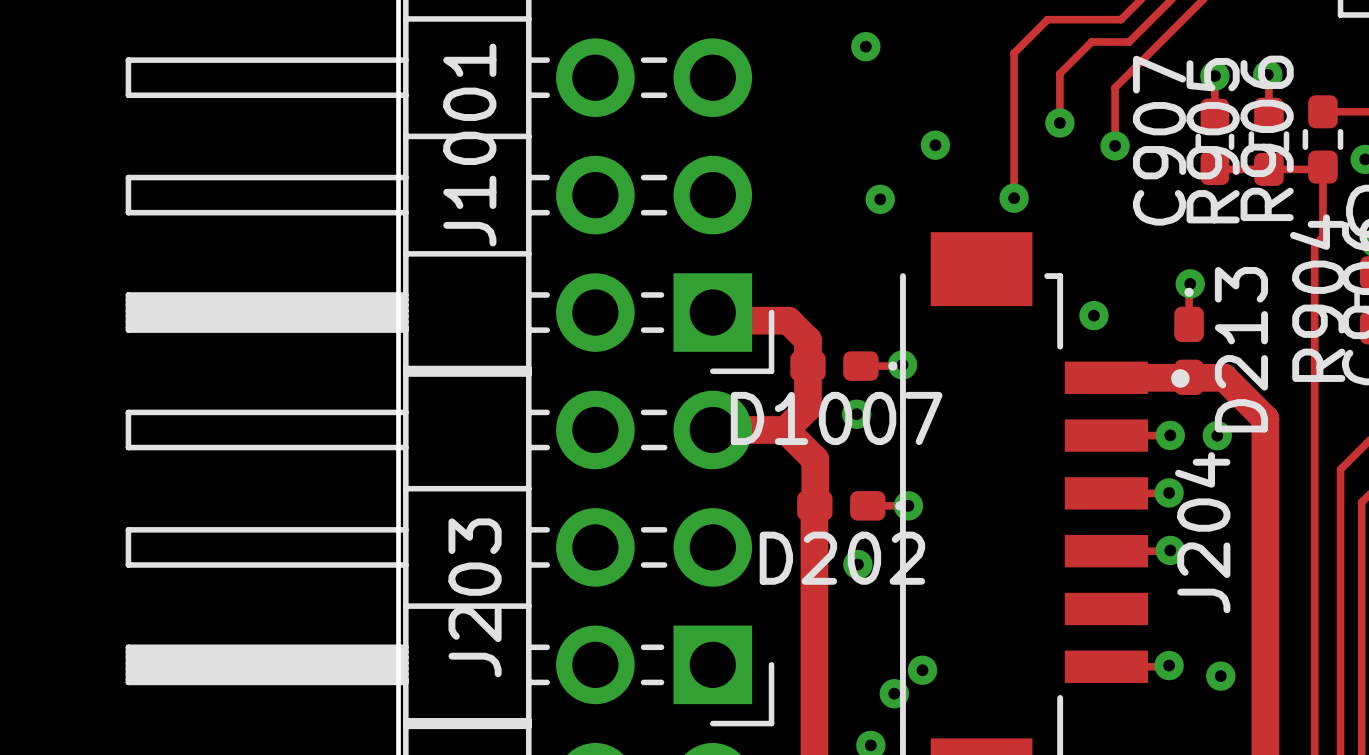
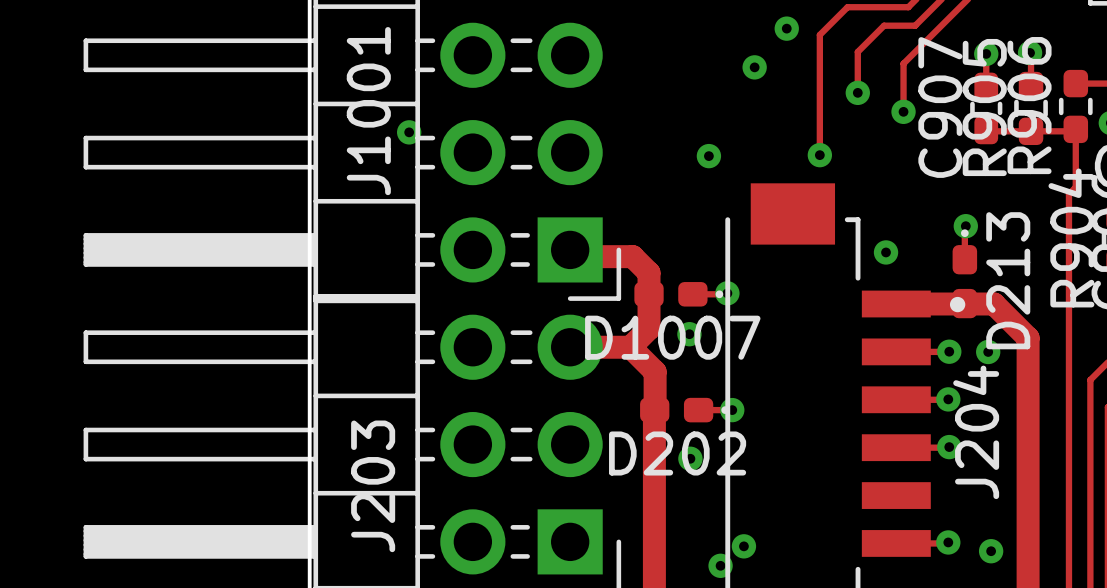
via: none -> (786, 28)
via: (865, 46) -> none
via: none -> (754, 67)
via: (935, 145) -> none
via: none -> (409, 132)

